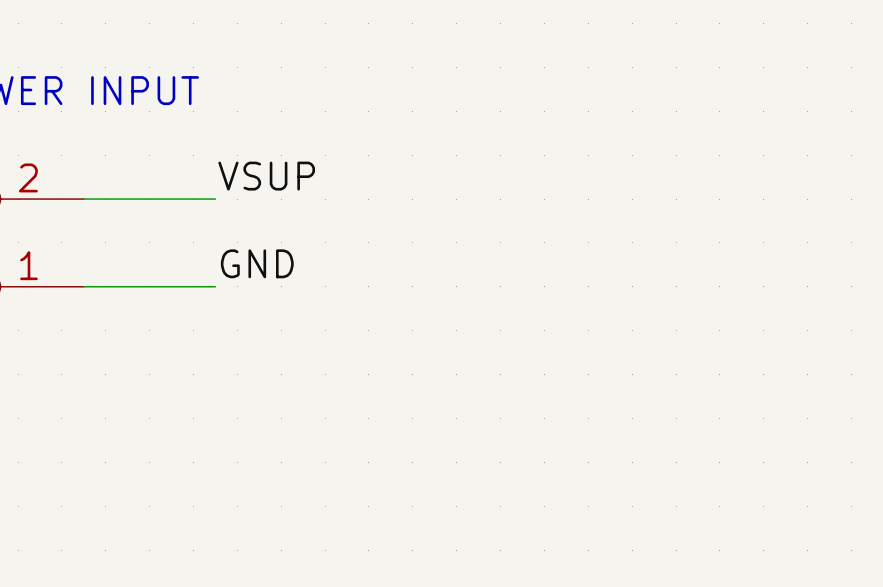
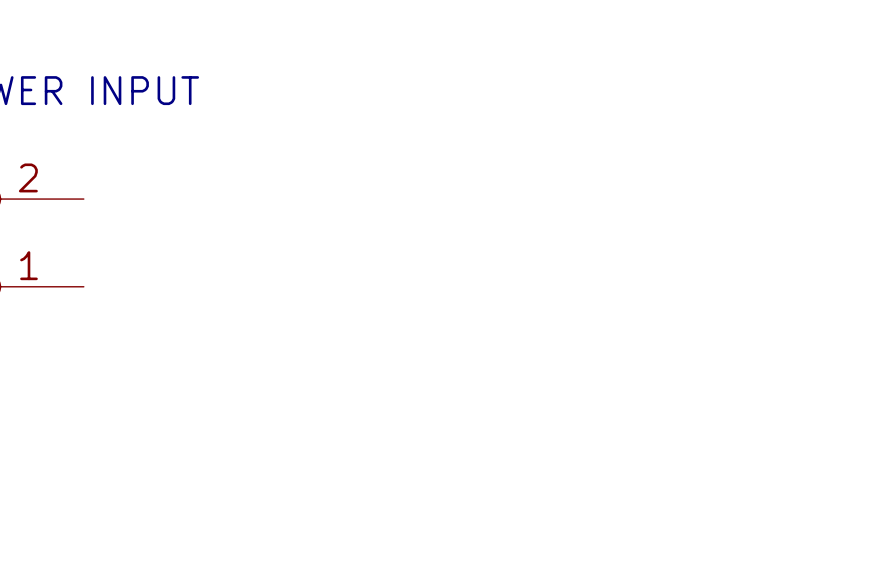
label: VSUP (266, 176) -> none
wire: (83, 199) (215, 199) -> none
label: GND (257, 263) -> none
wire: (83, 286) (215, 286) -> none

